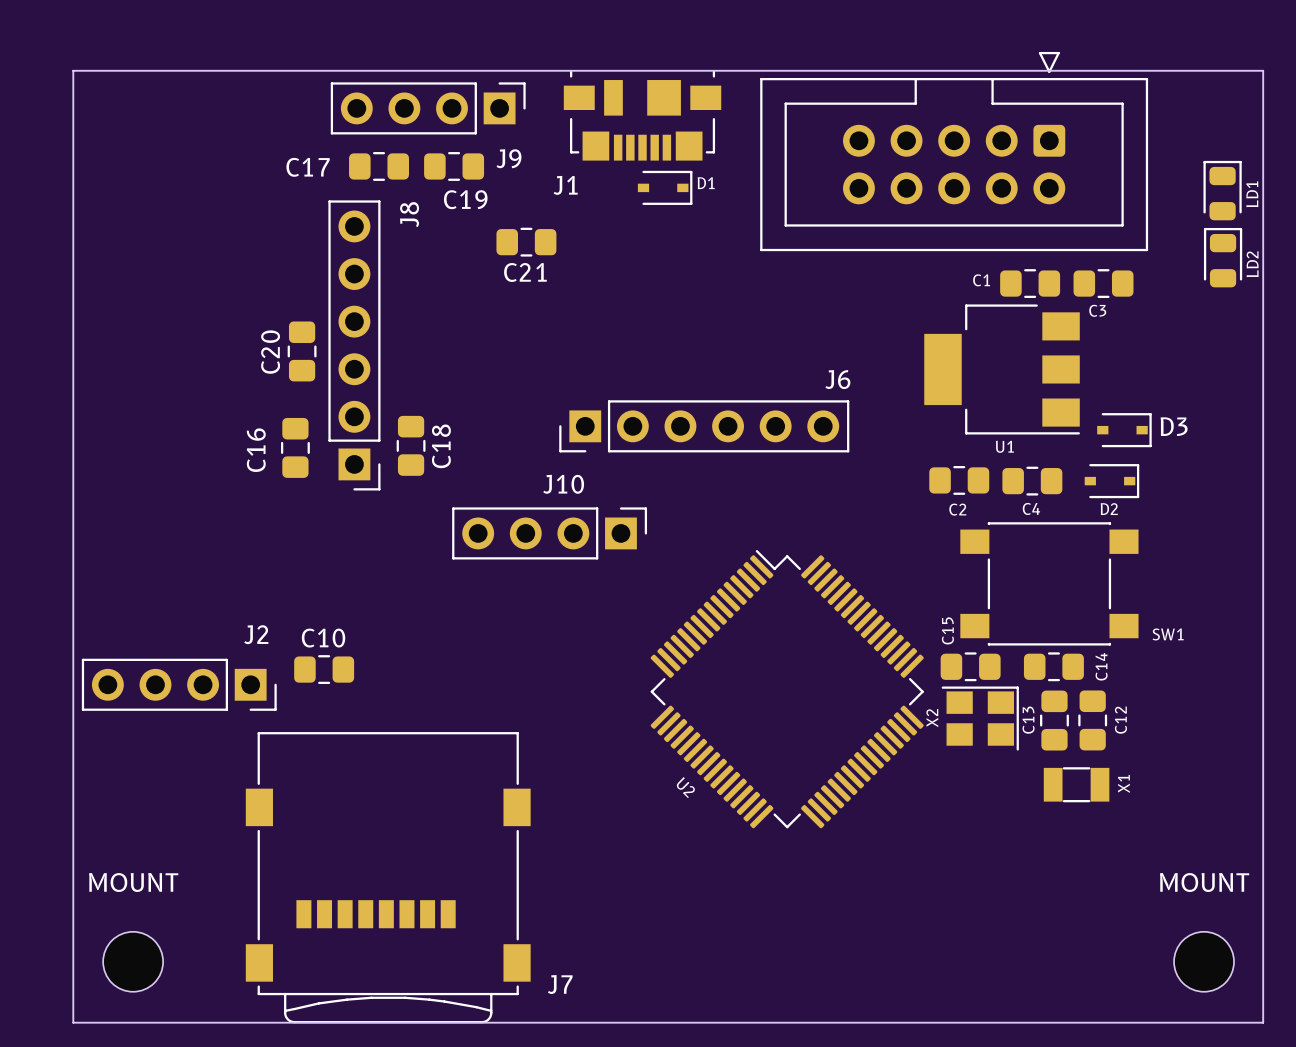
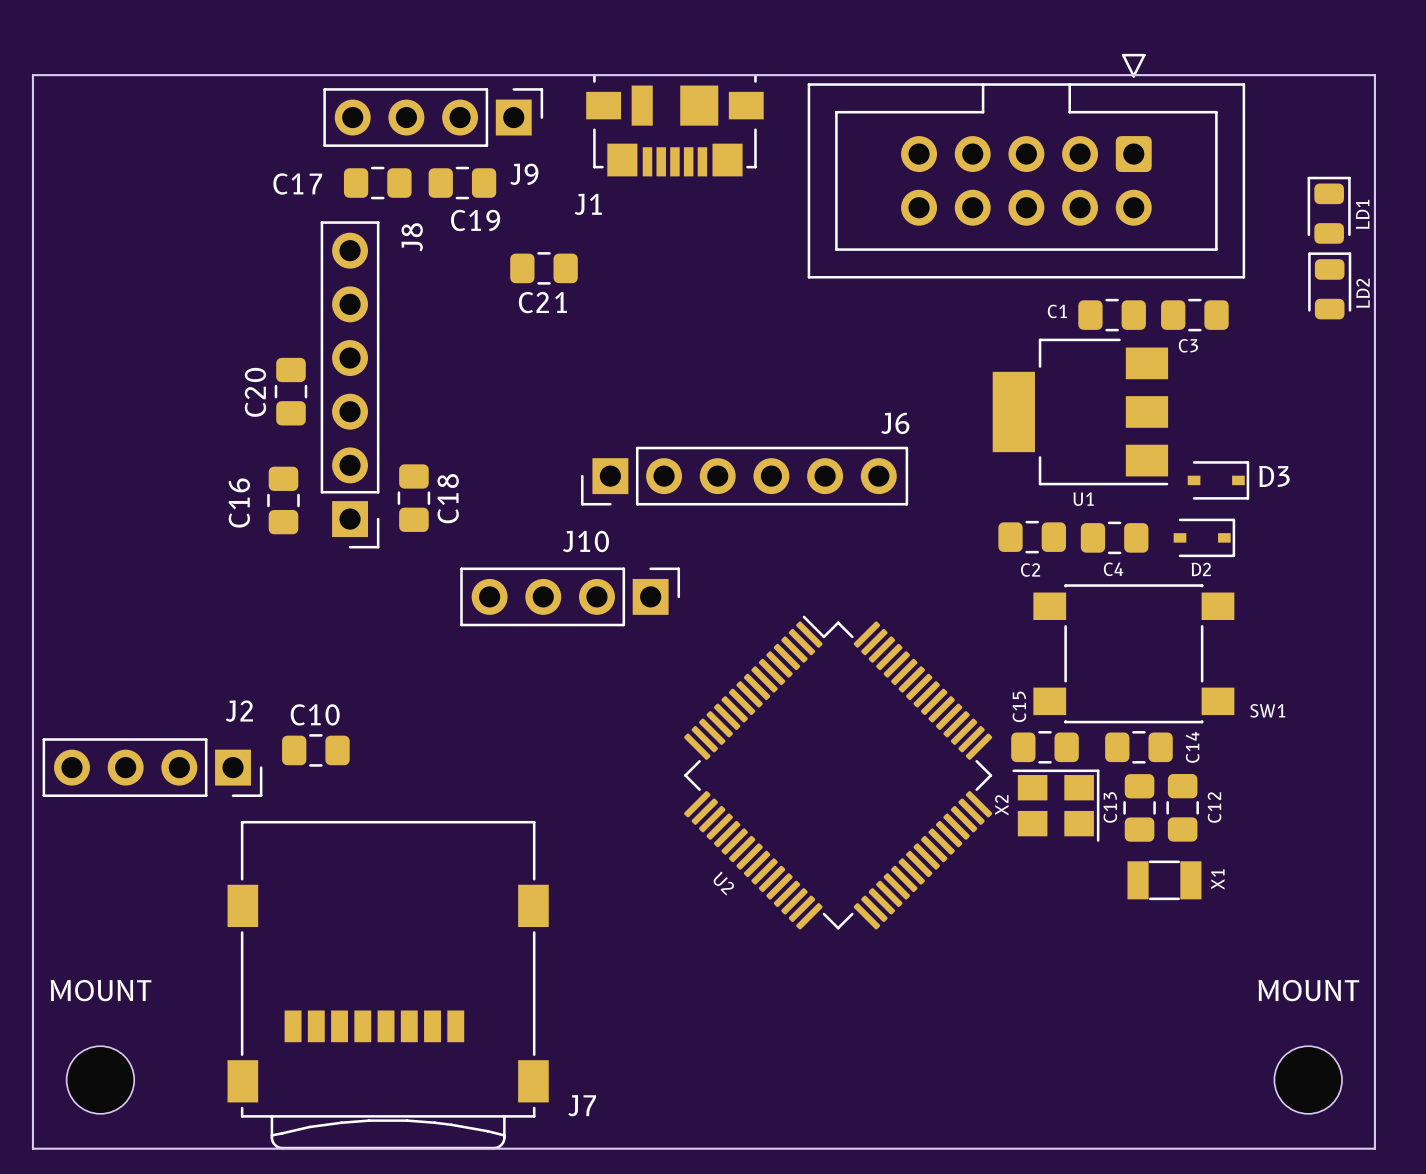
D1: (665, 187) -> none

